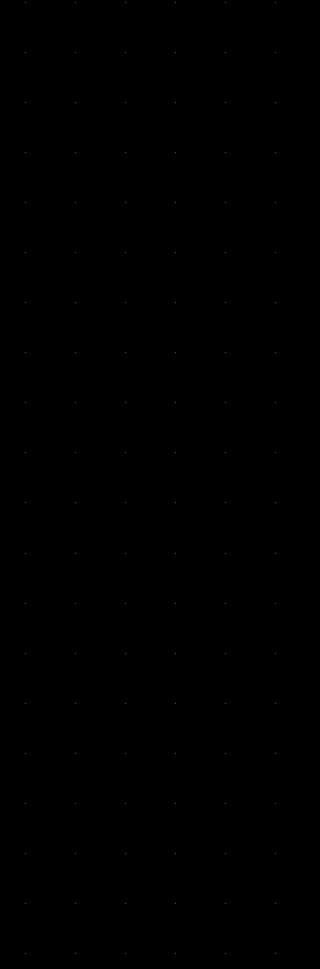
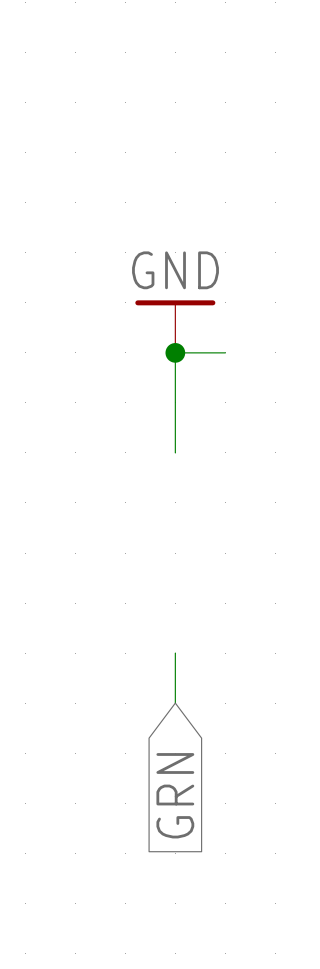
power symbol: none -> GND (175, 326)
junction: none -> (175, 352)
wire: none -> (225, 352) (175, 352) (175, 452)
wire: none -> (175, 653) (175, 703)
global label: none -> GRN (175, 795)

